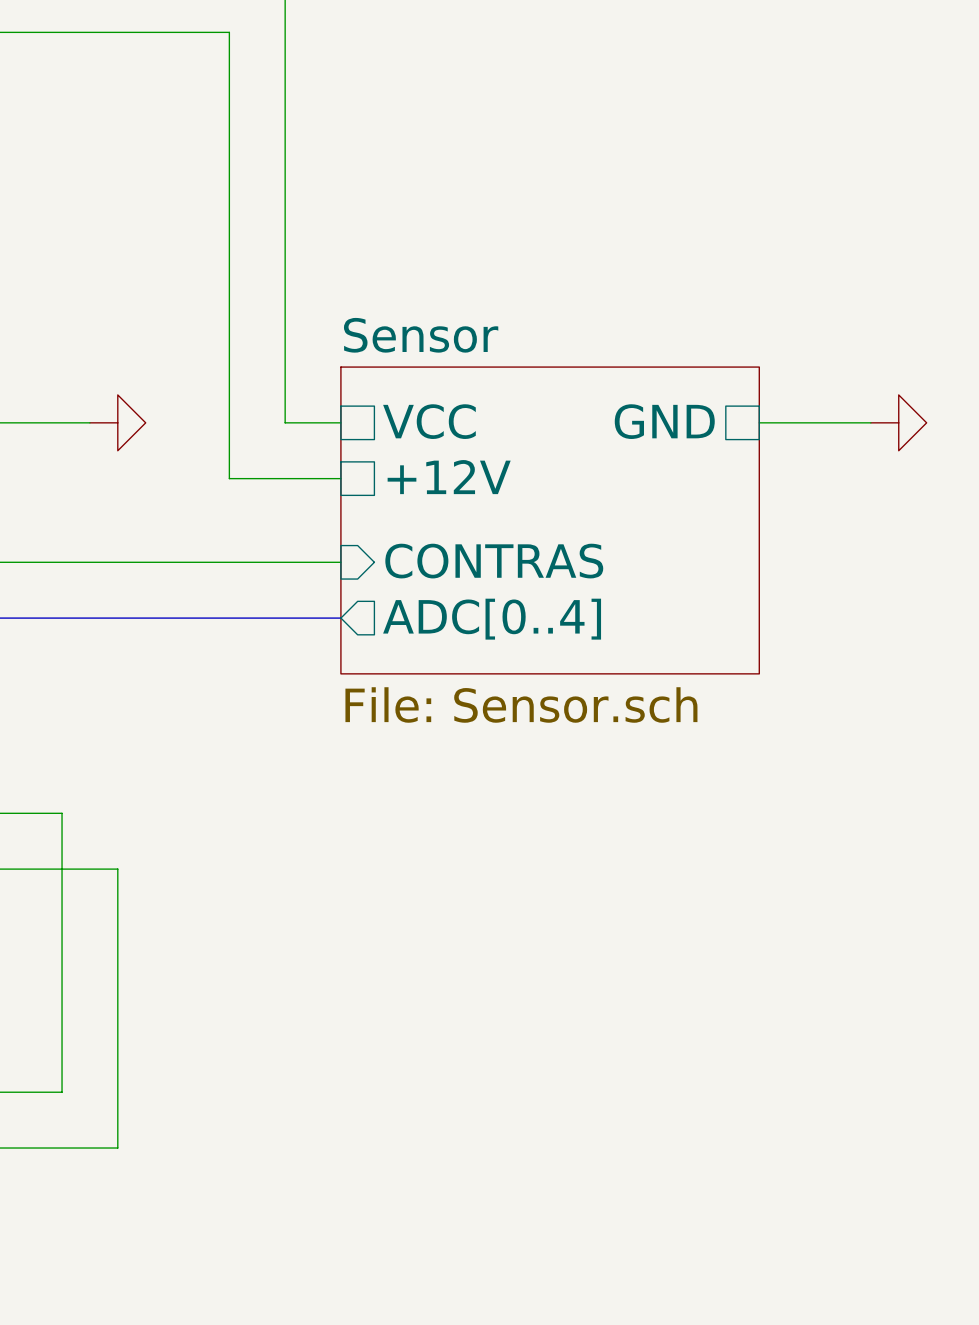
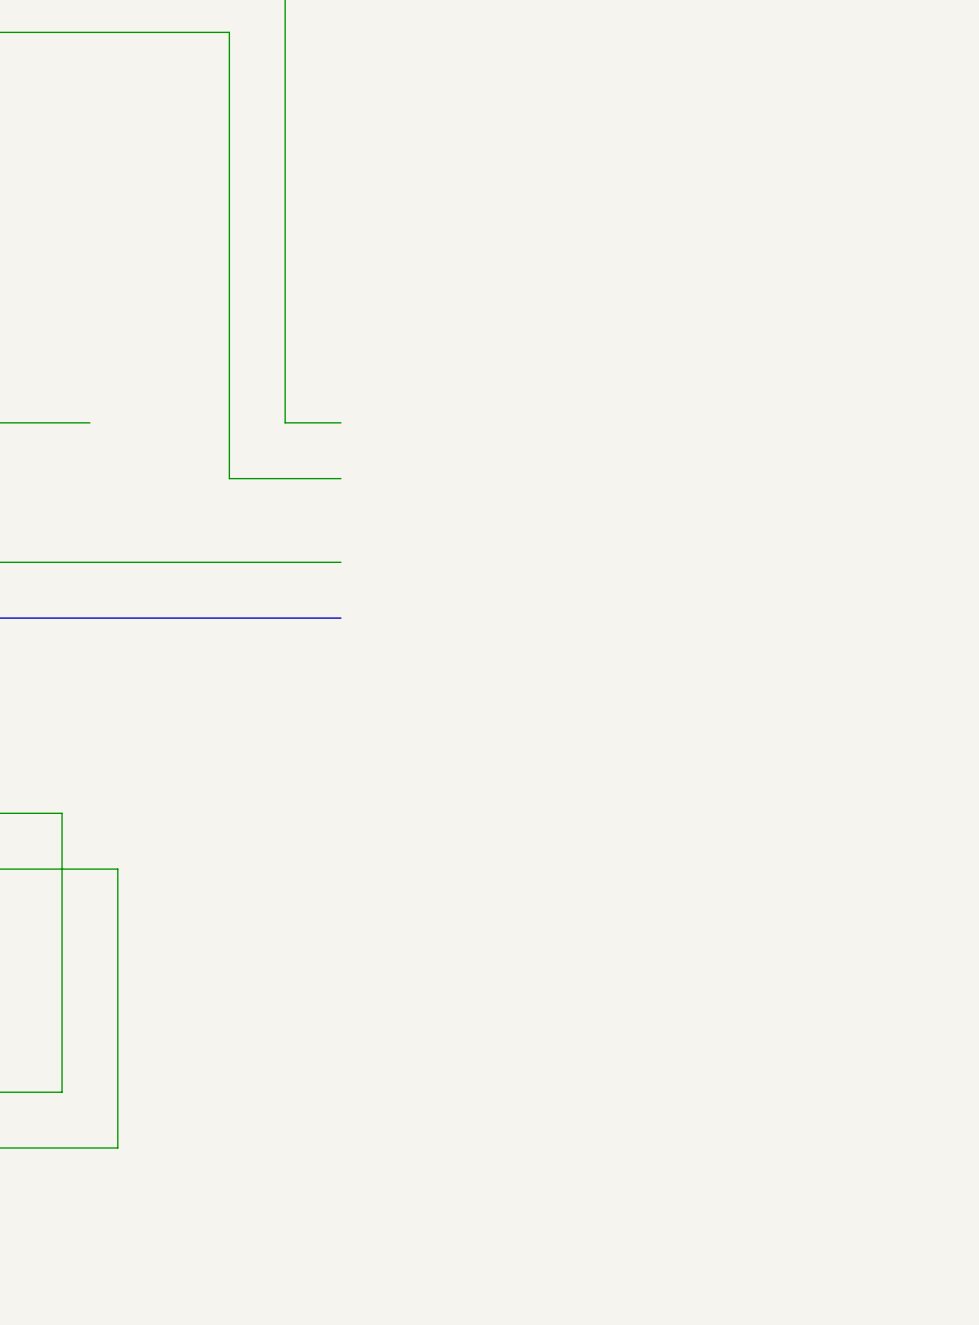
sheet pin: VCC (429, 421) -> none
sheet pin: GND (664, 421) -> none
power symbol: (117, 422) -> none
wire: (759, 422) (870, 422) -> none
power symbol: (898, 422) -> none
sheet pin: +12V (449, 477) -> none
sheet Sensor: File: Sensor.sch (550, 520) -> none
sheet pin: CONTRAS (494, 561) -> none
sheet pin: ADC[0..4] (492, 619) -> none

